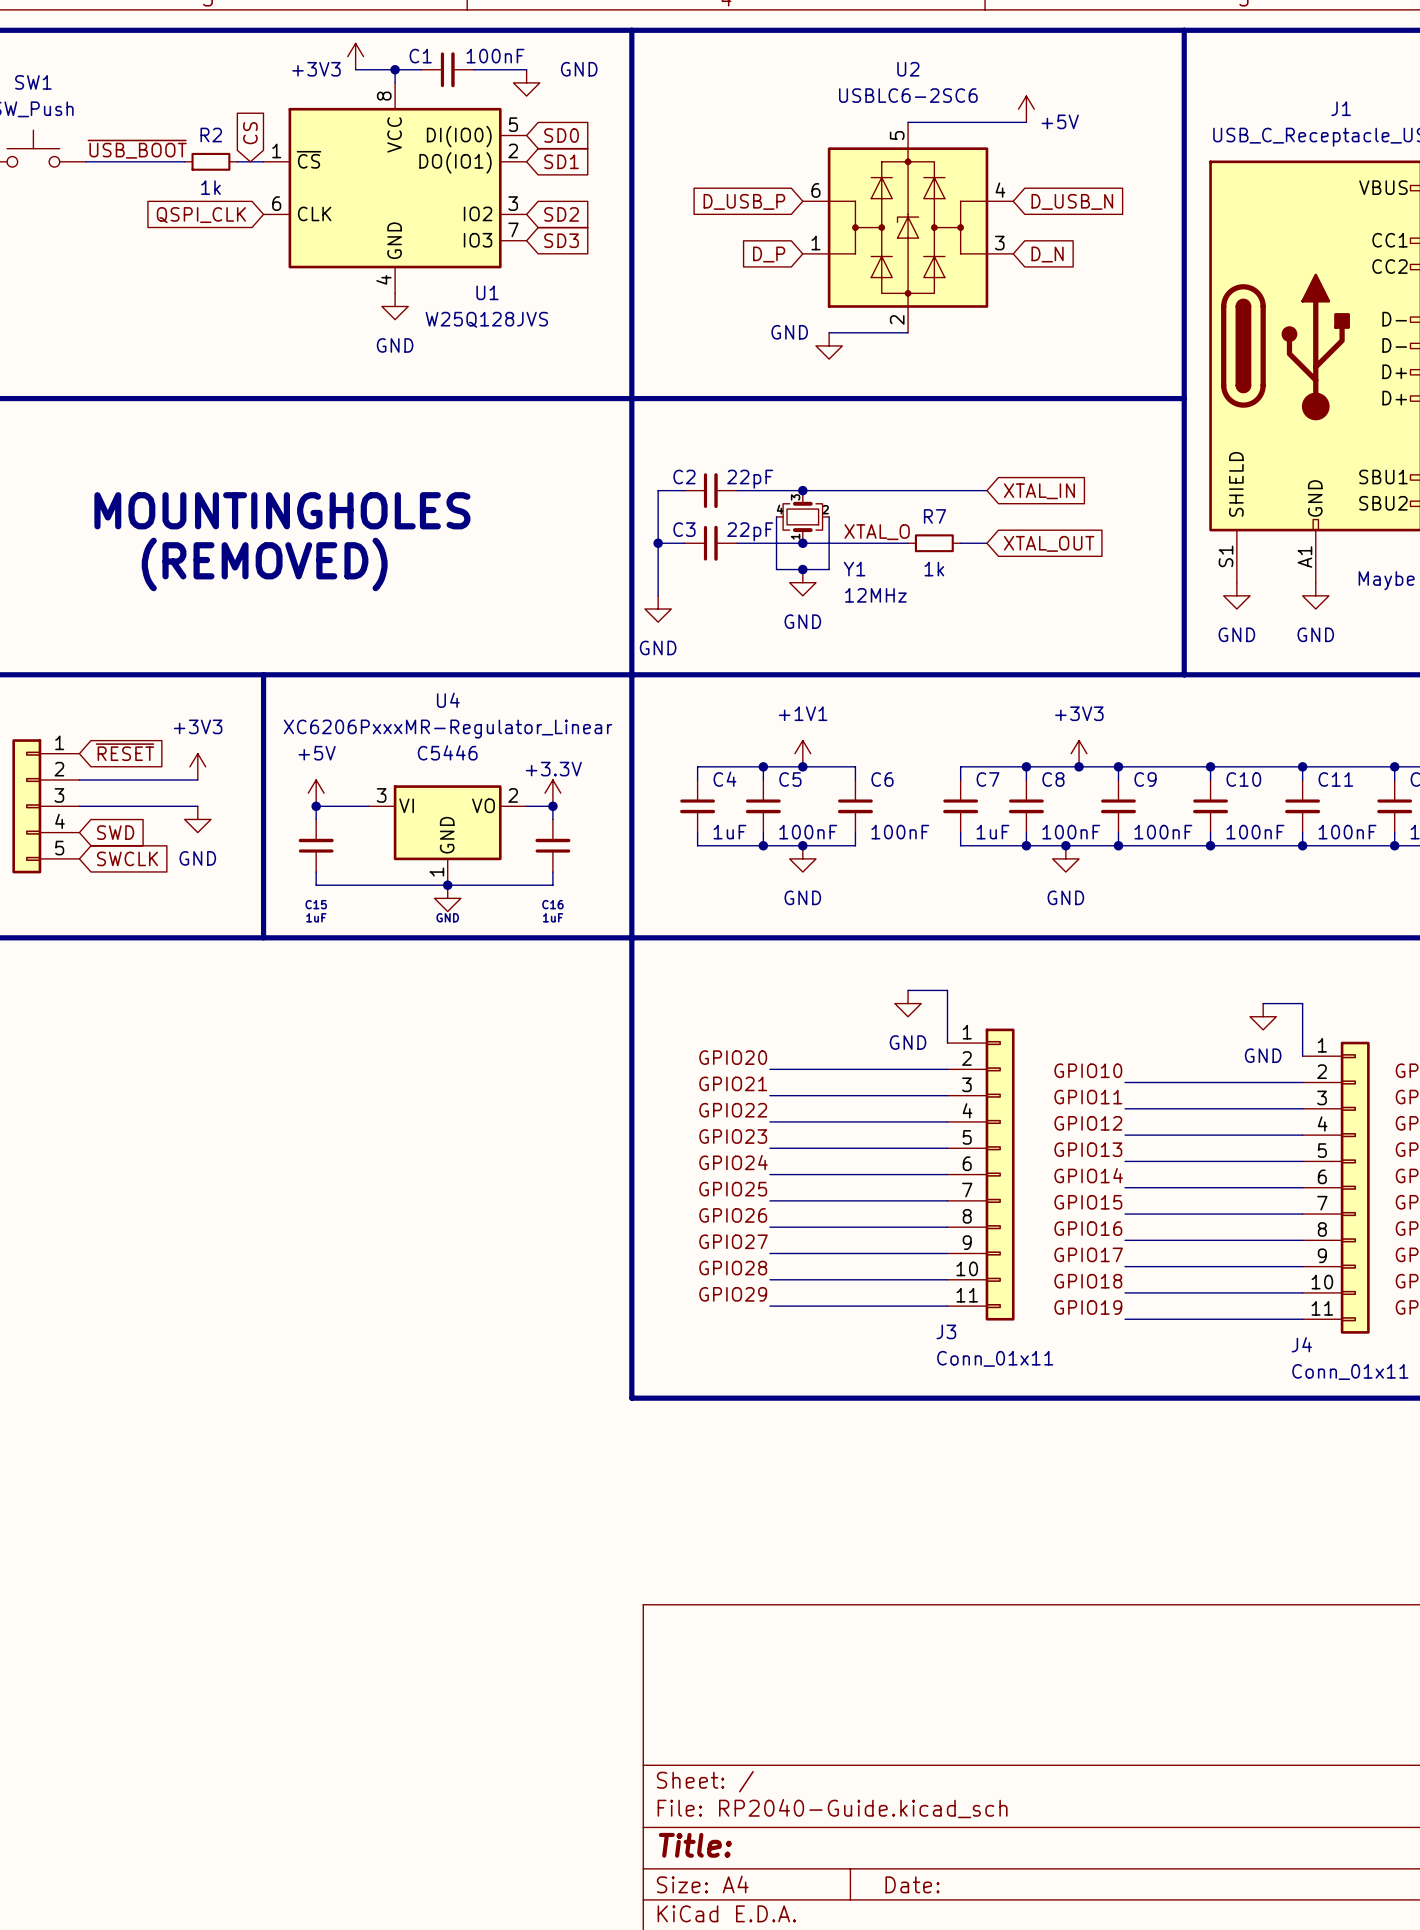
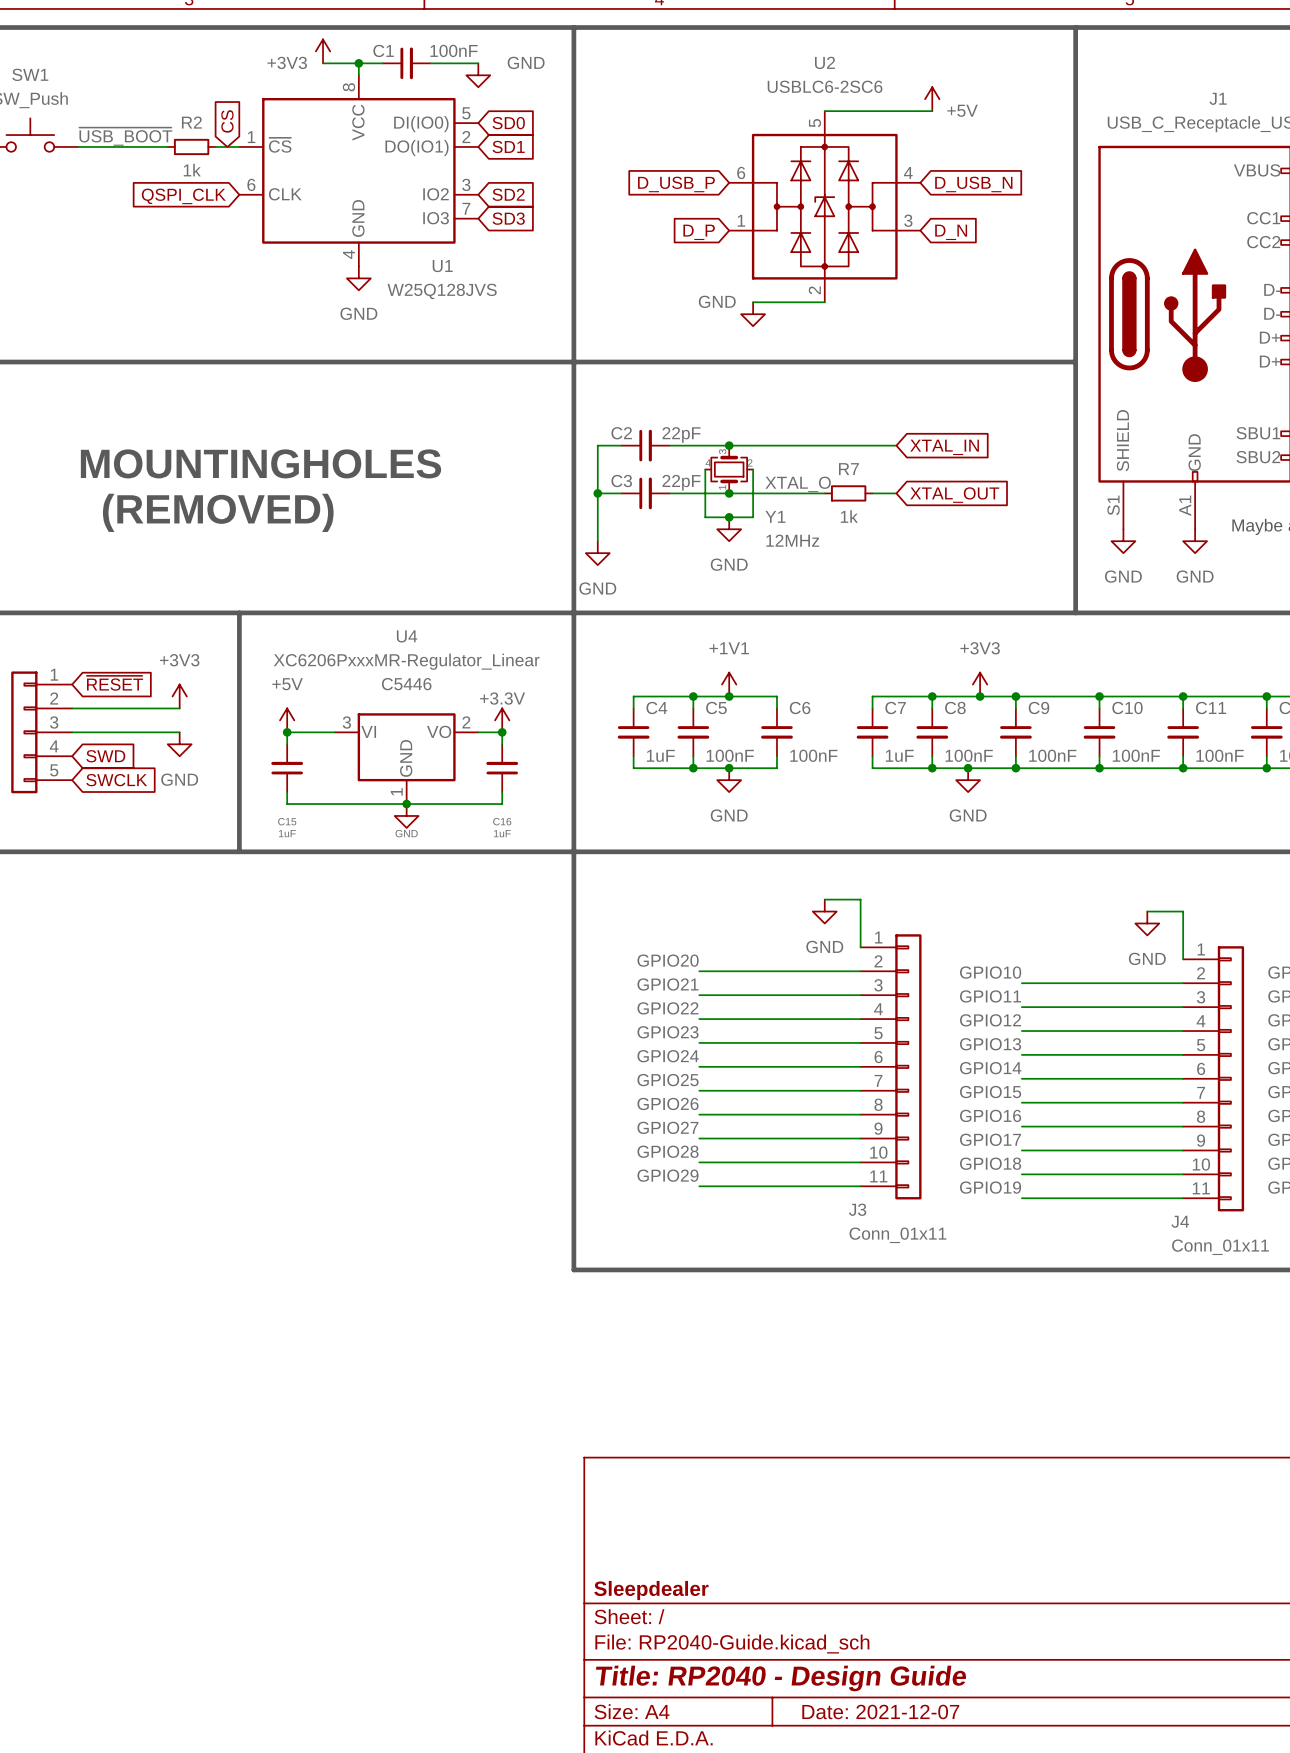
title block: none -> Sleepdealer (651, 1590)
title block: Title: (695, 1845) -> Title: RP2040 - Design Guide (781, 1678)
title block: Date: (912, 1884) -> Date: 2021-12-07 (880, 1711)

